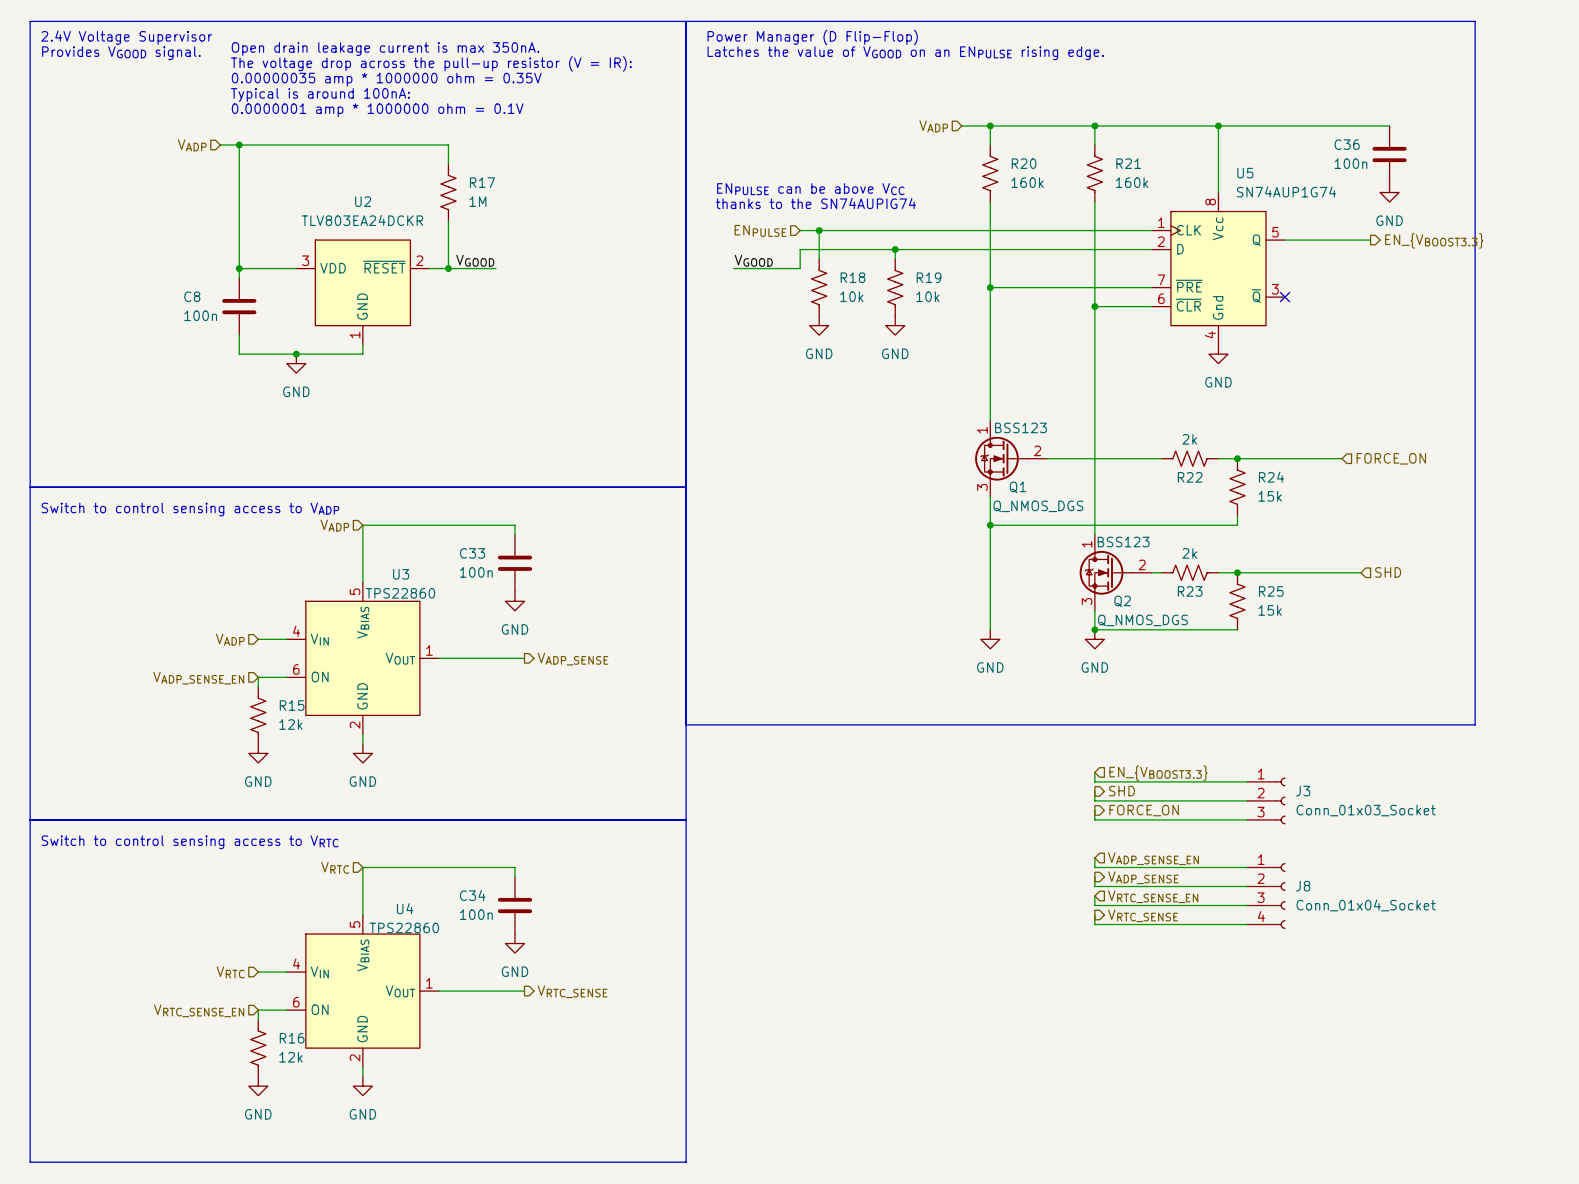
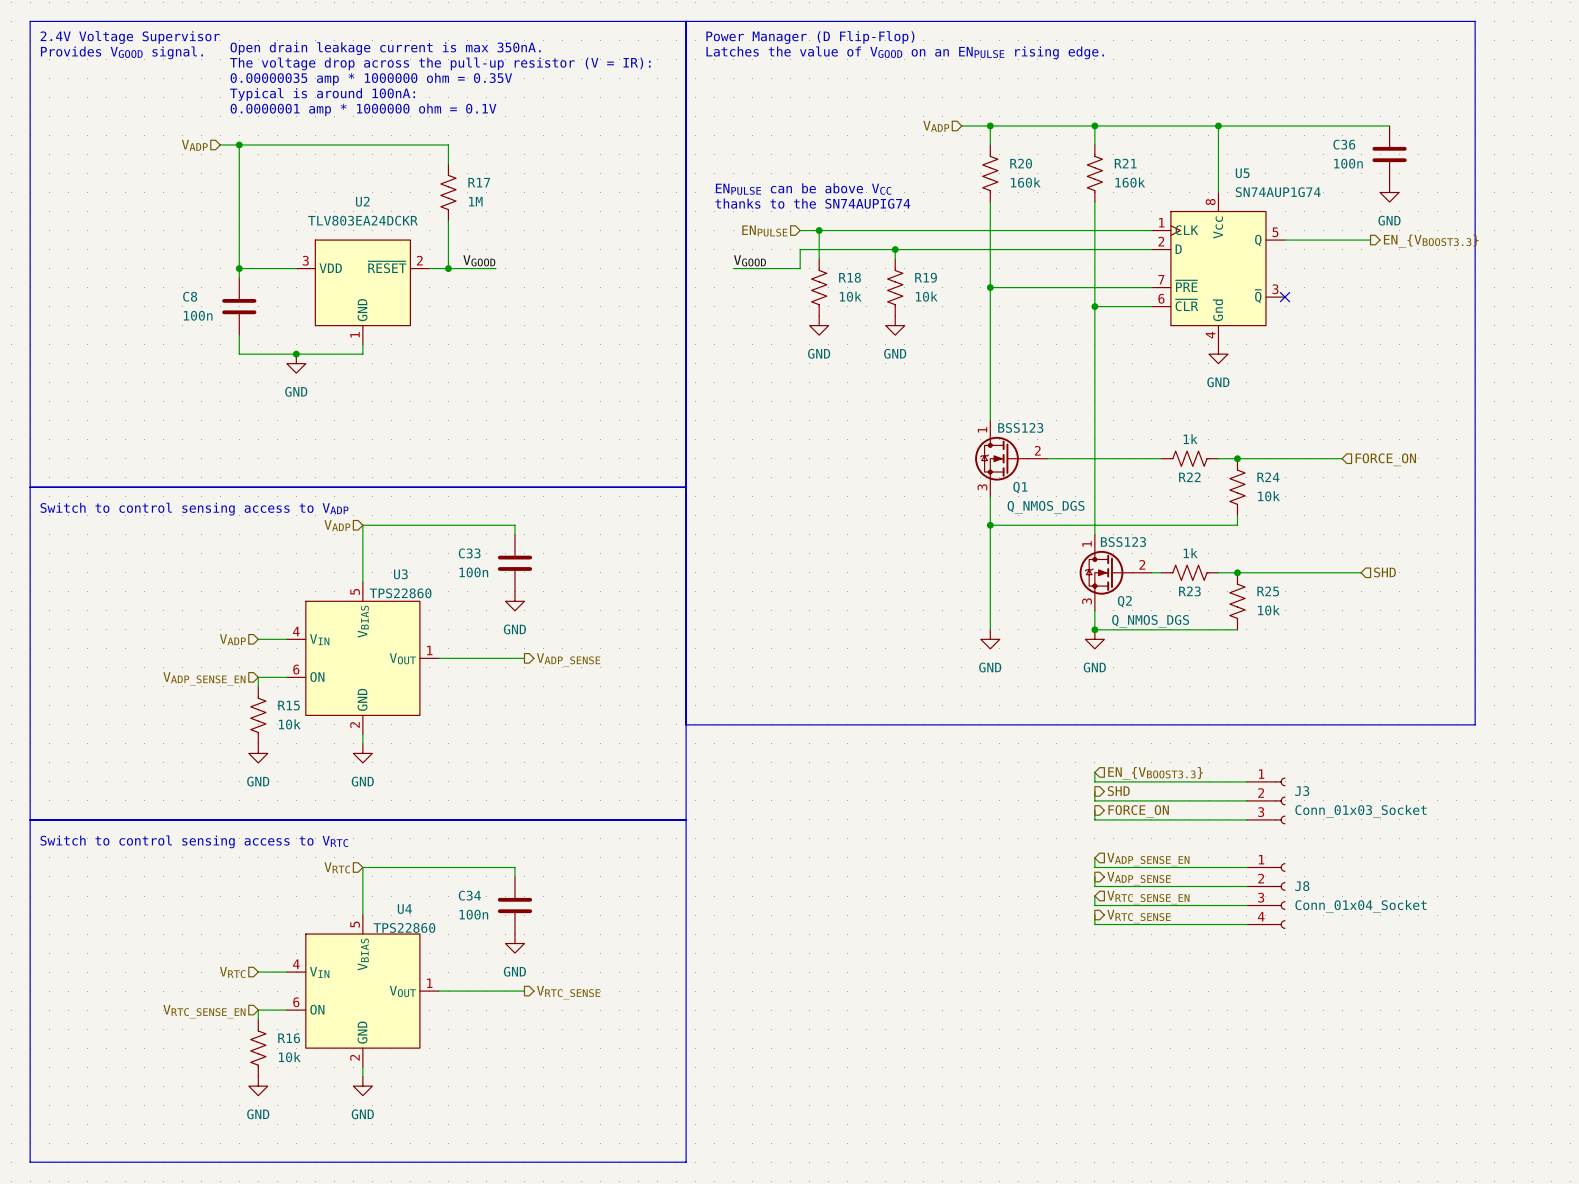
R22 value: 2k (1189, 439) -> 1k (1190, 439)
R24 value: 15k (1270, 496) -> 10k (1268, 496)
R23 value: 2k (1189, 553) -> 1k (1190, 553)
R25 value: 15k (1270, 610) -> 10k (1268, 610)
R15 value: 12k (290, 724) -> 10k (289, 724)
R16 value: 12k (290, 1057) -> 10k (289, 1057)

